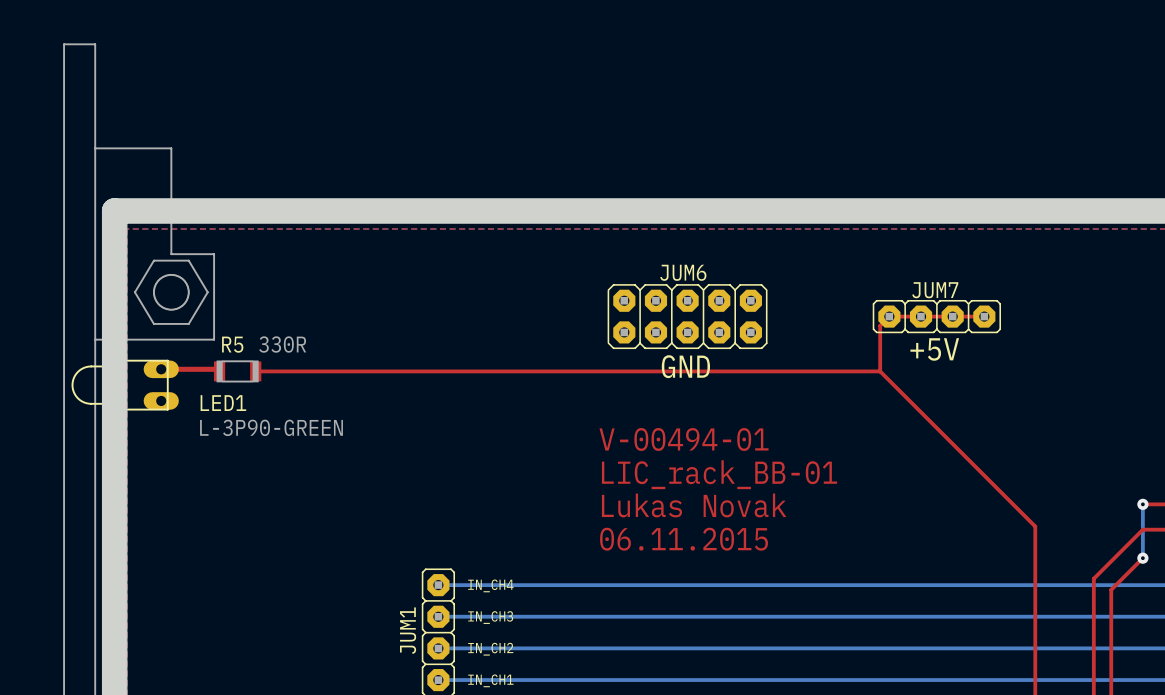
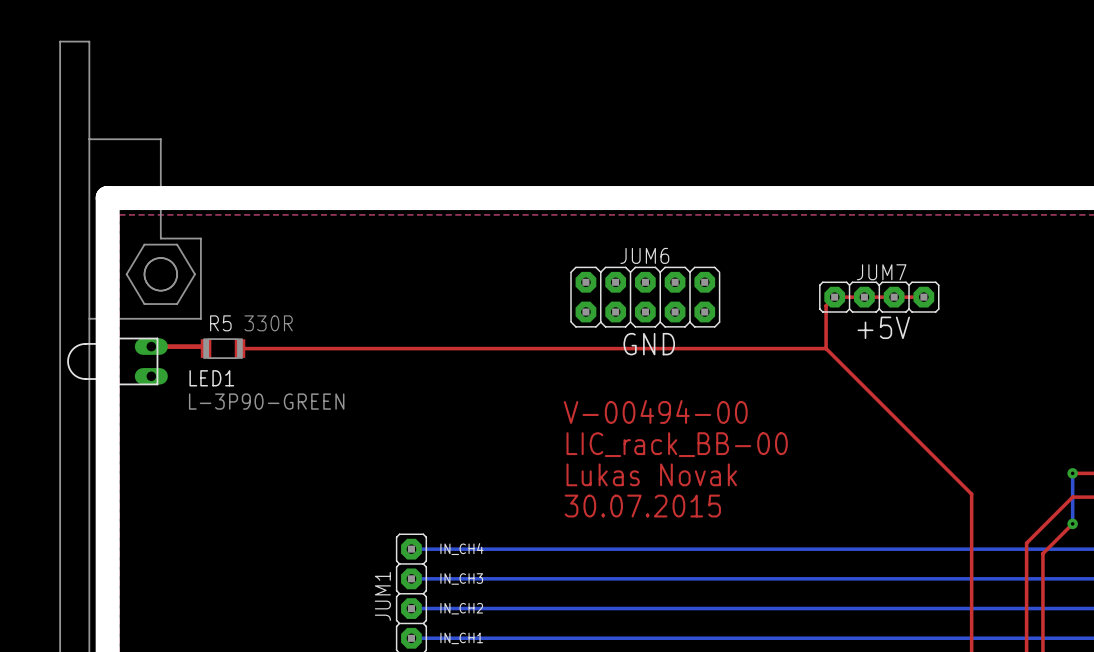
text: V-00494-01 (684, 439) -> V-00494-00 (655, 411)
text: LIC_rack_BB-01 (719, 474) -> LIC_rack_BB-00 (677, 444)
text: 06.11.2015 (684, 539) -> 30.07.2015 (642, 506)

